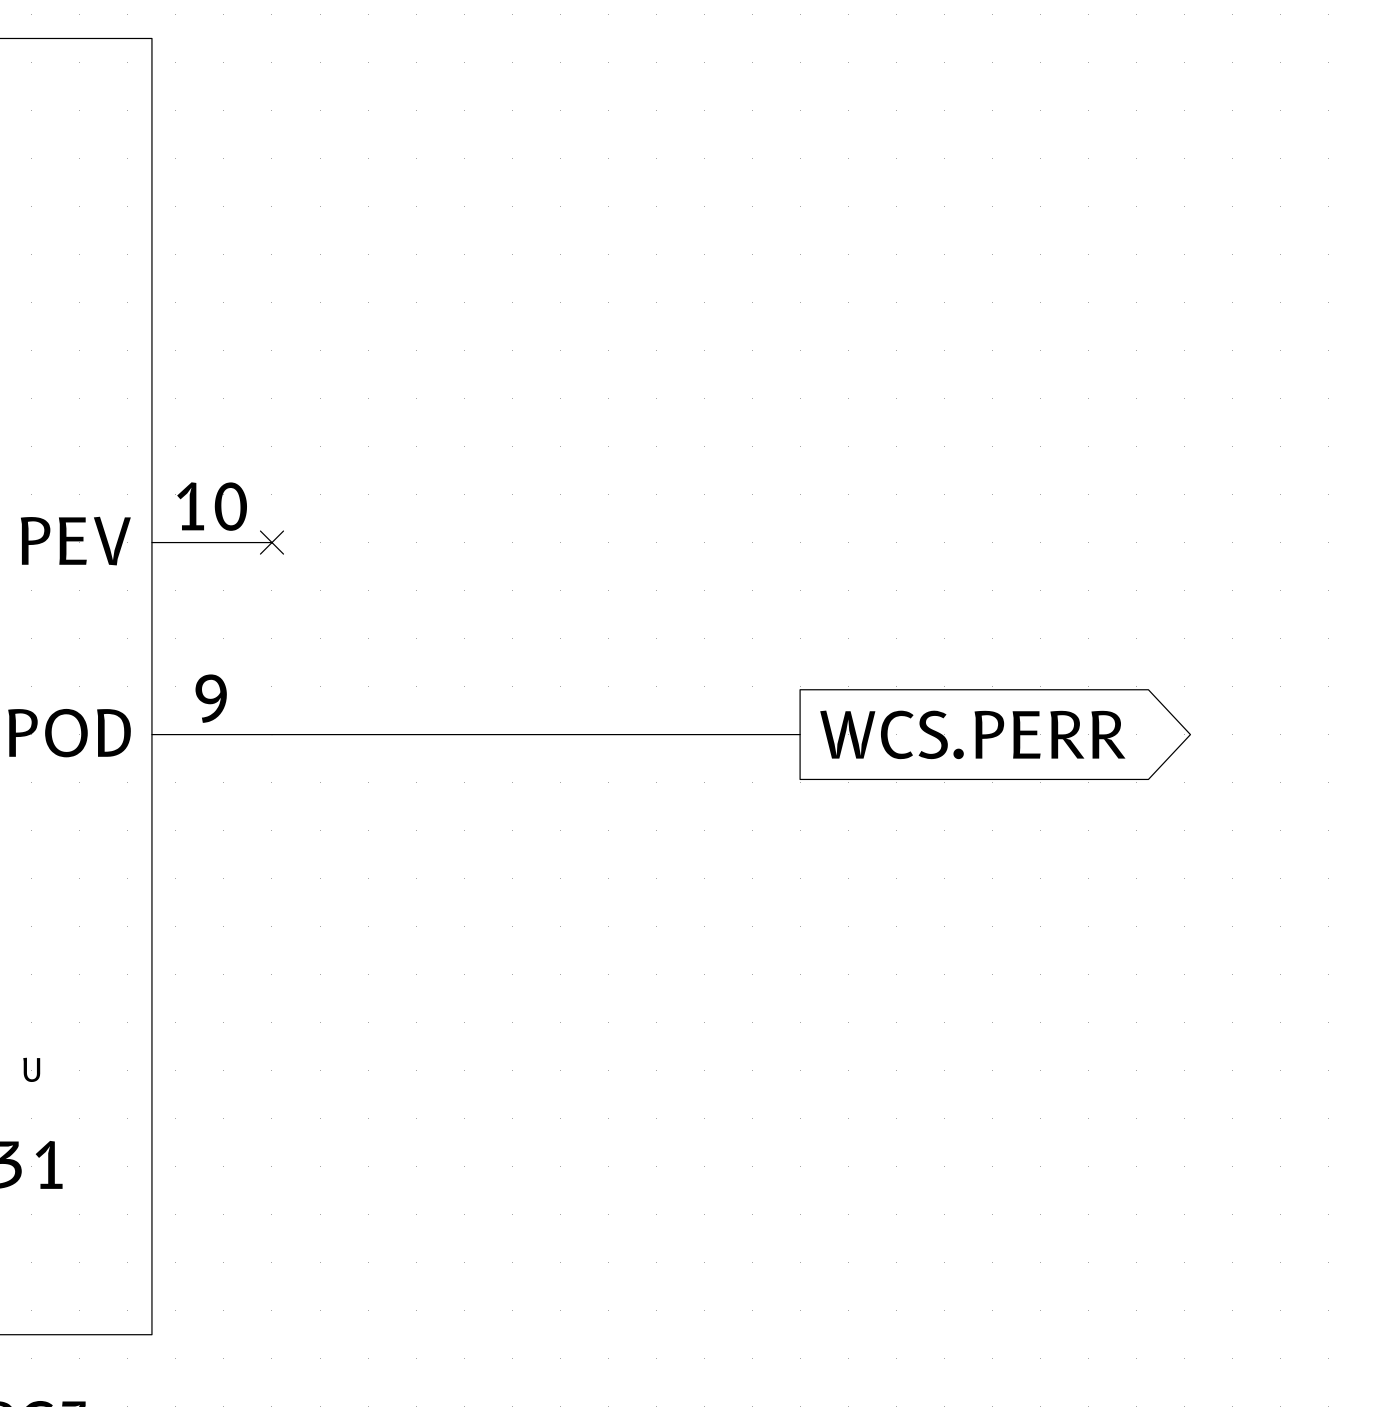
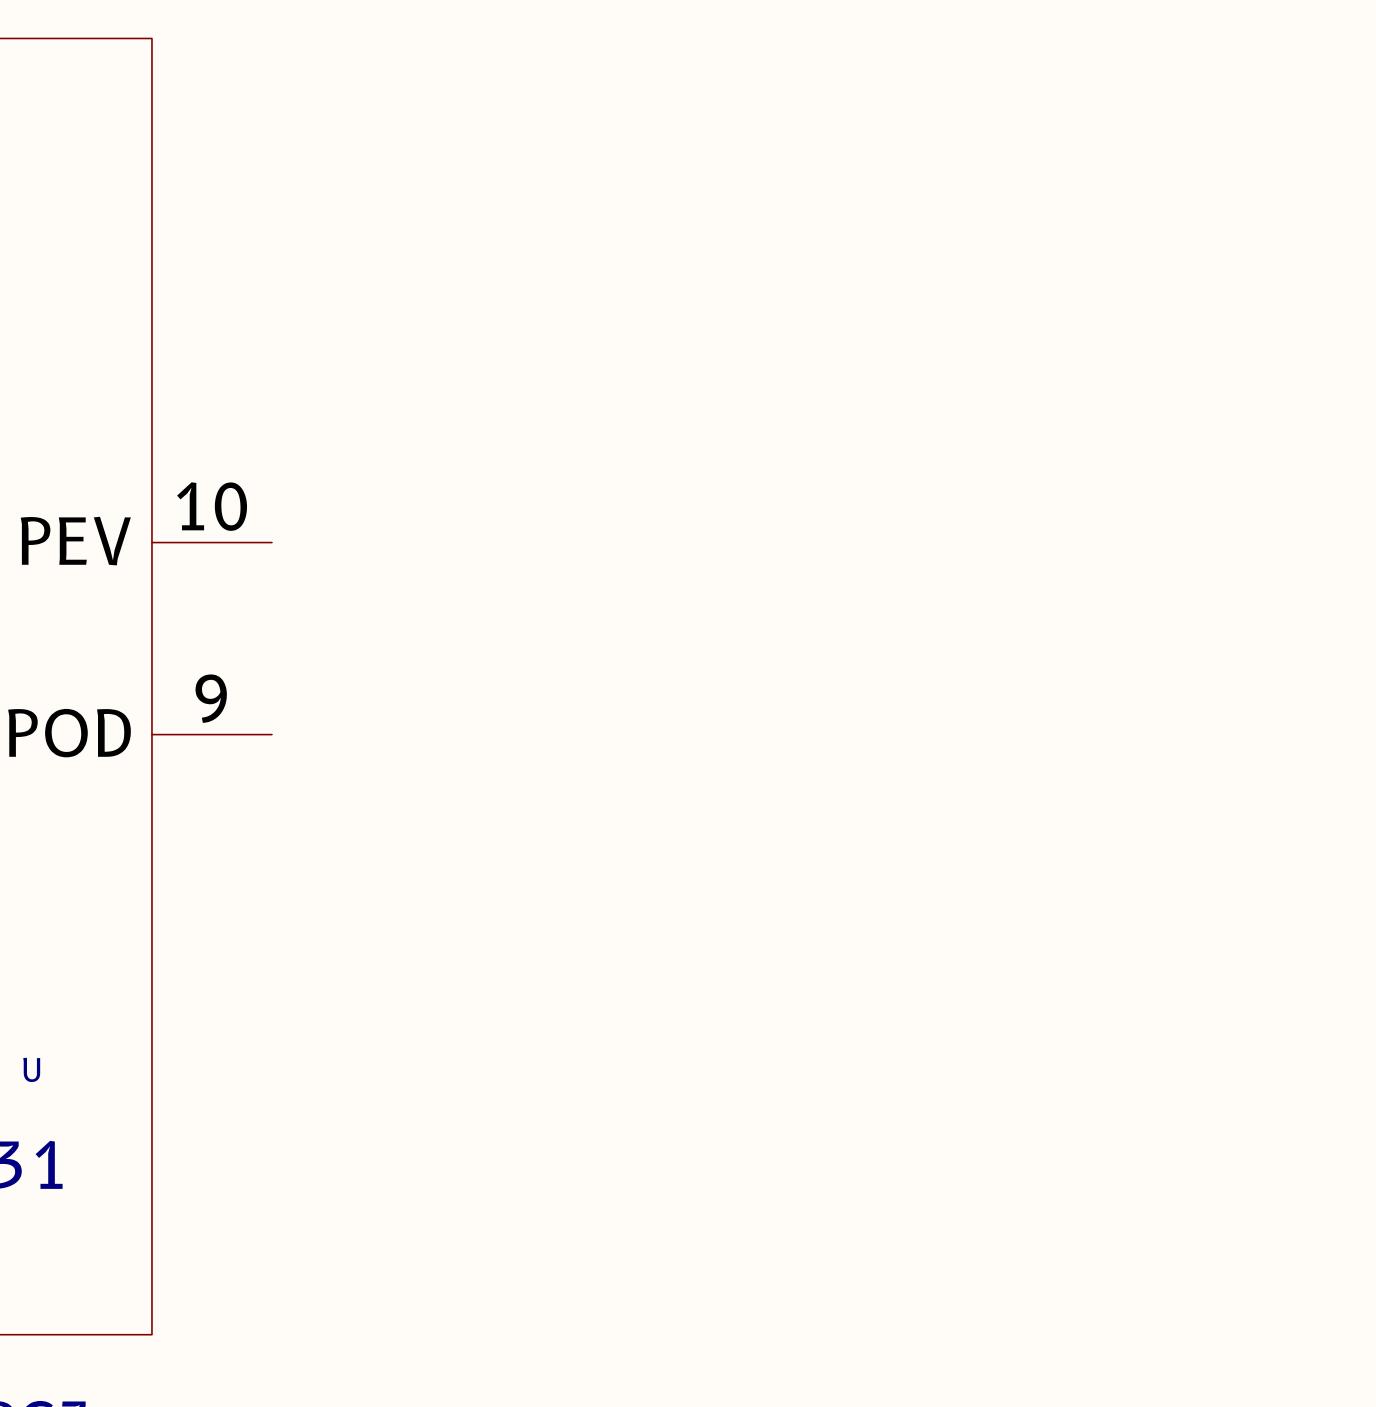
no-connect mark: (271, 542) -> none
wire: (271, 734) (800, 734) -> none
global label: WCS.PERR (972, 734) -> none

